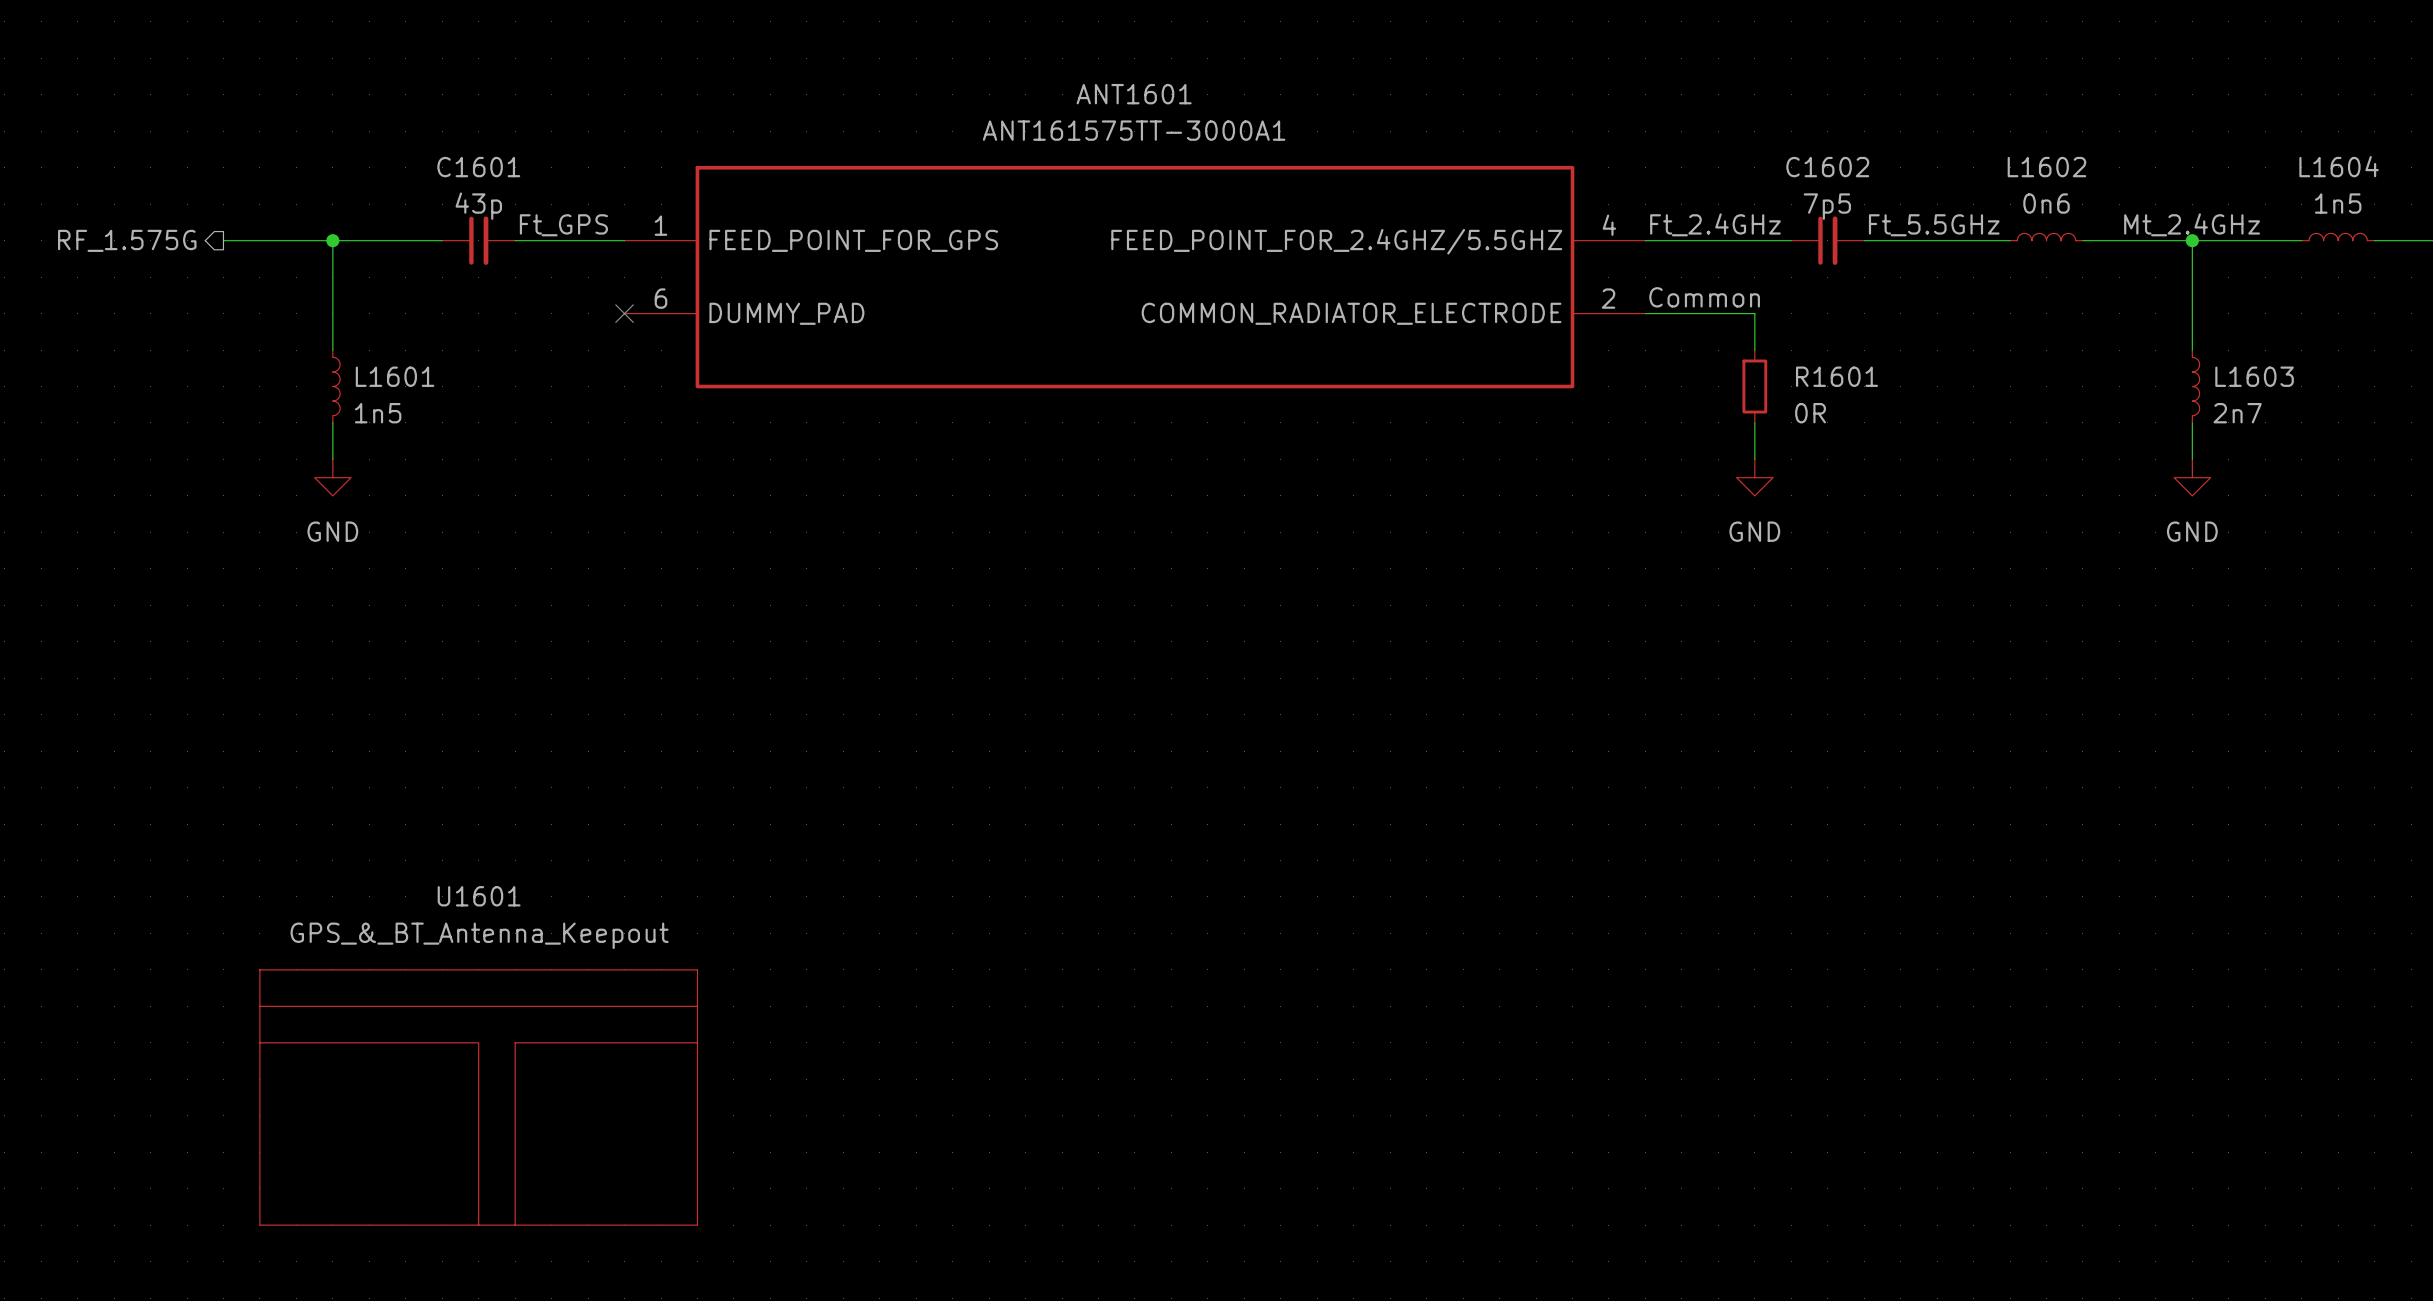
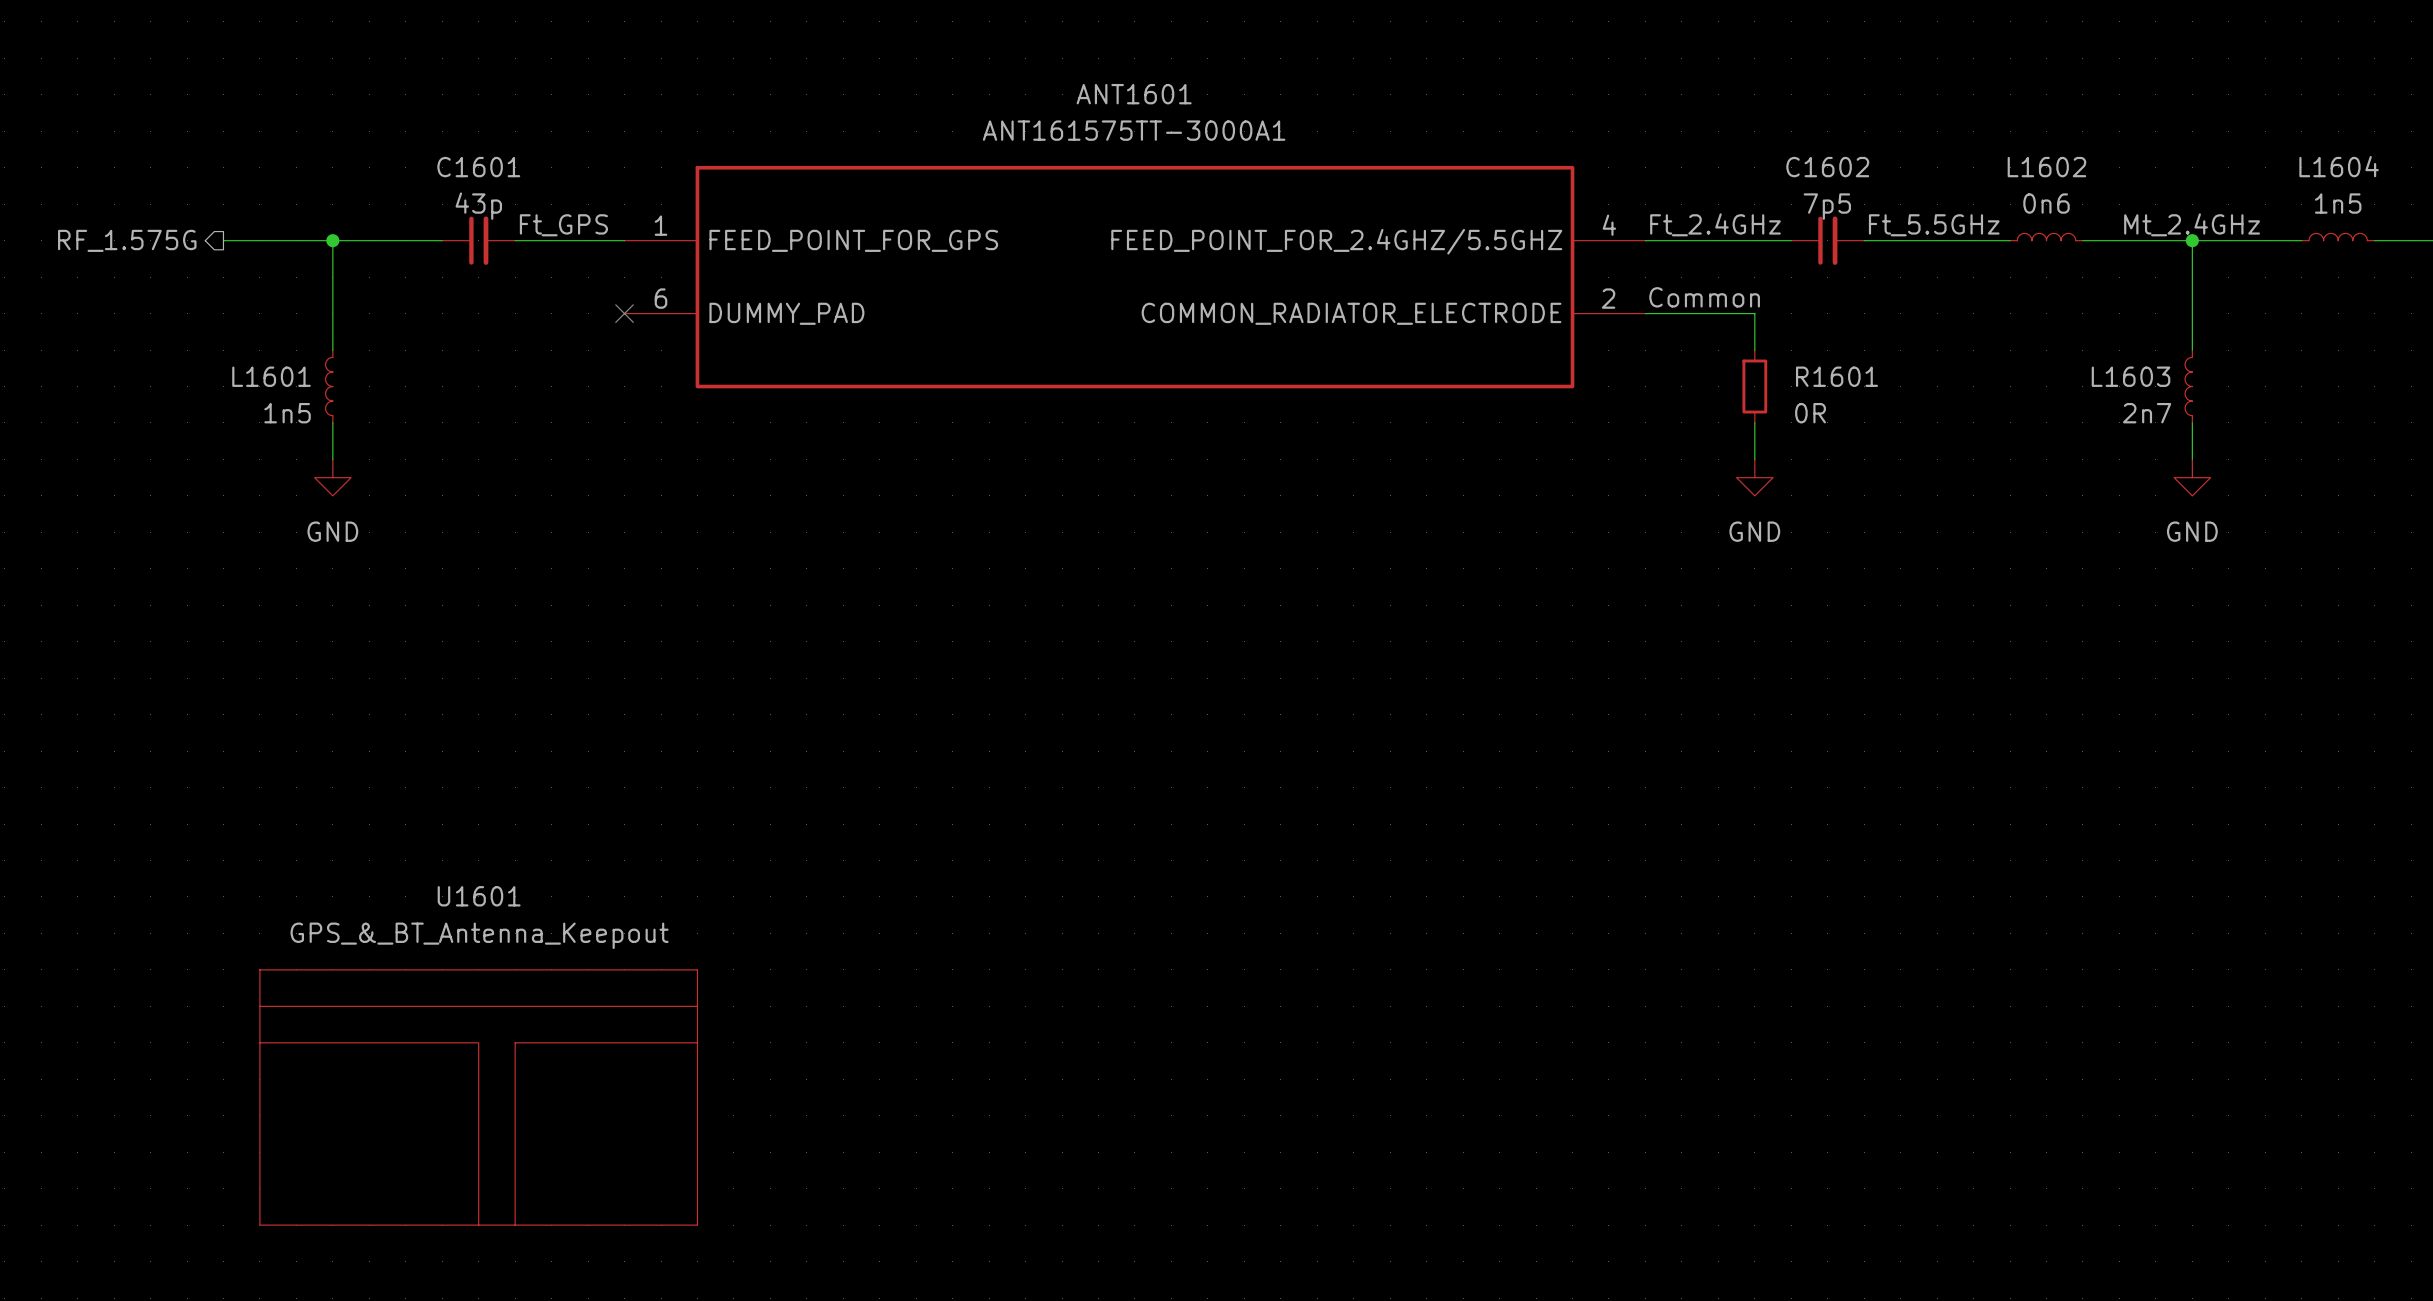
L1601 rotation: 0° (336, 386) -> 180° (329, 386)
L1603 rotation: 0° (2195, 386) -> 180° (2188, 386)
L1601 value position: 1n5 (378, 413) -> 1n5 (287, 413)
L1603 value position: 2n7 (2237, 413) -> 2n7 (2147, 413)

